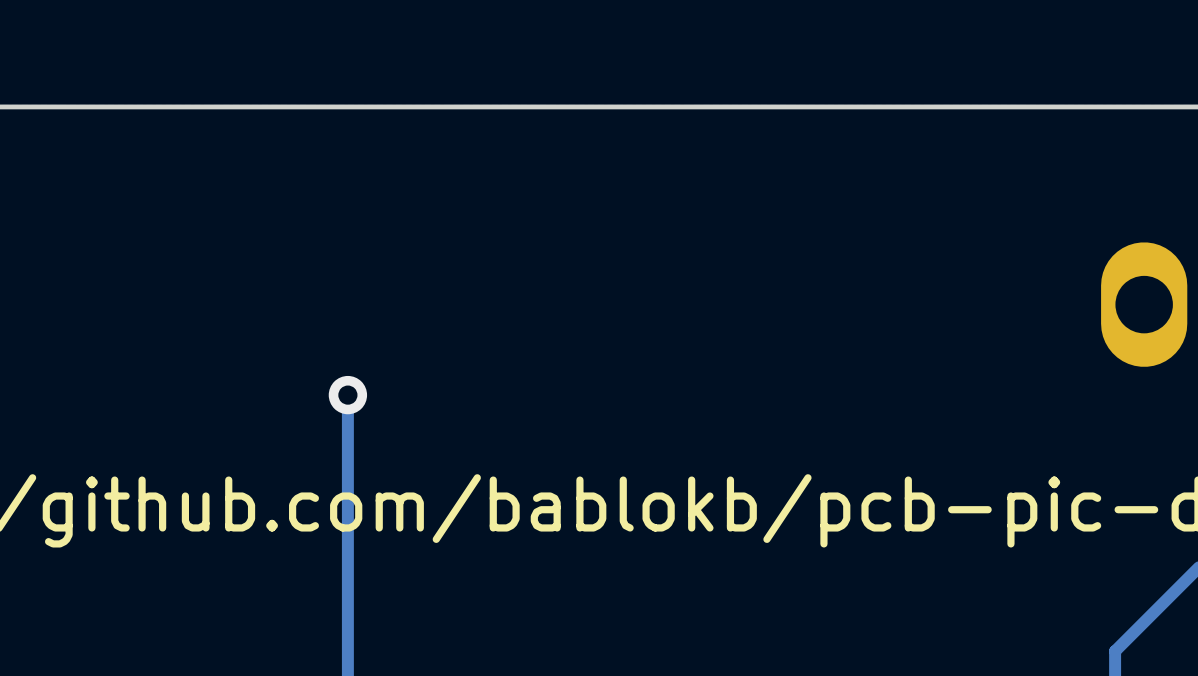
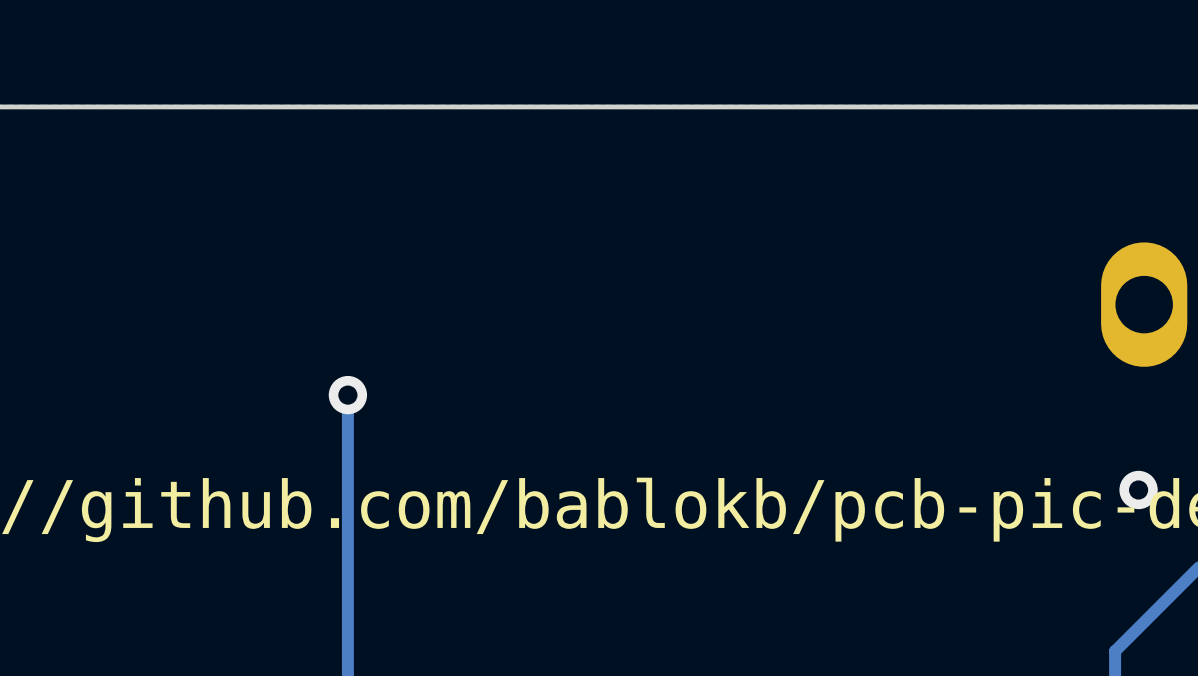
via: none -> (1138, 489)

